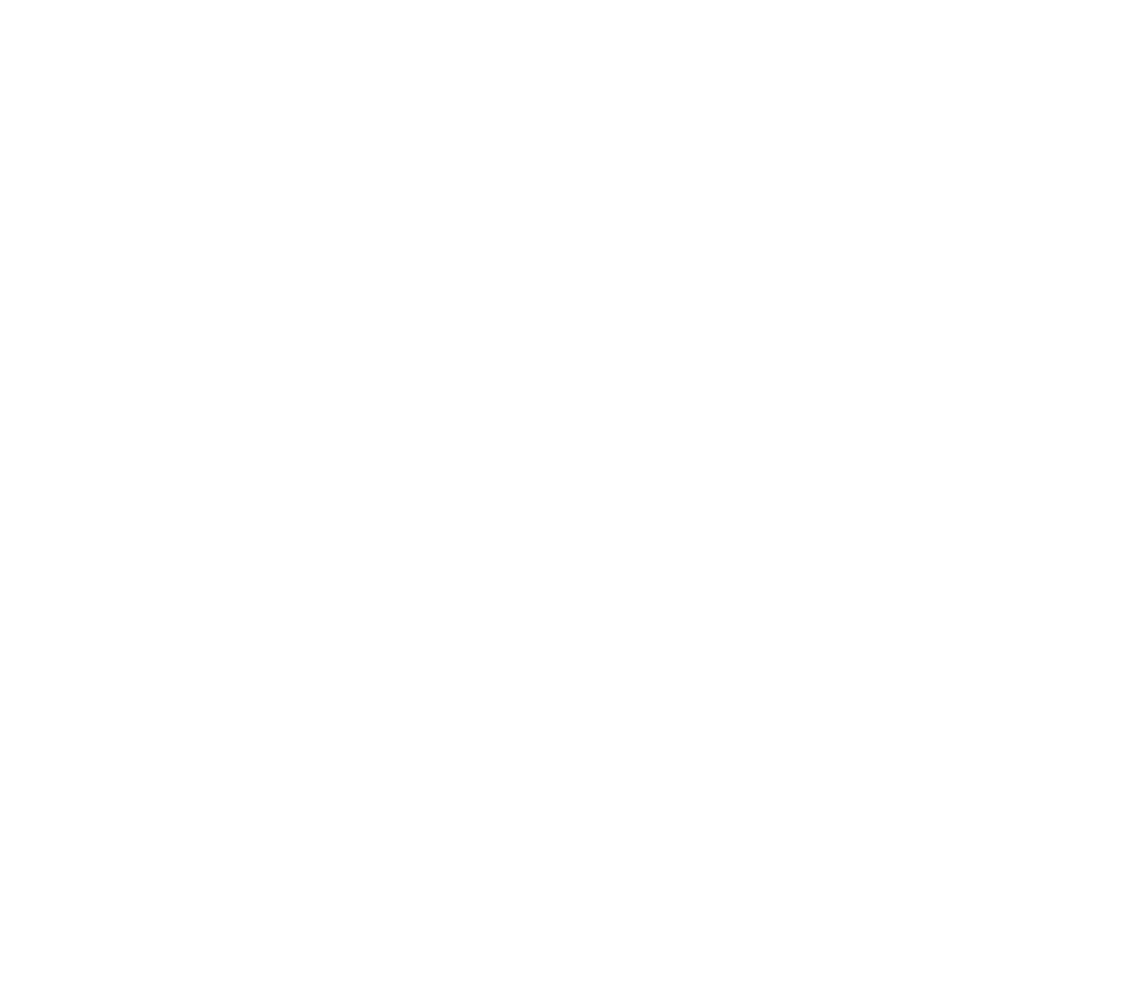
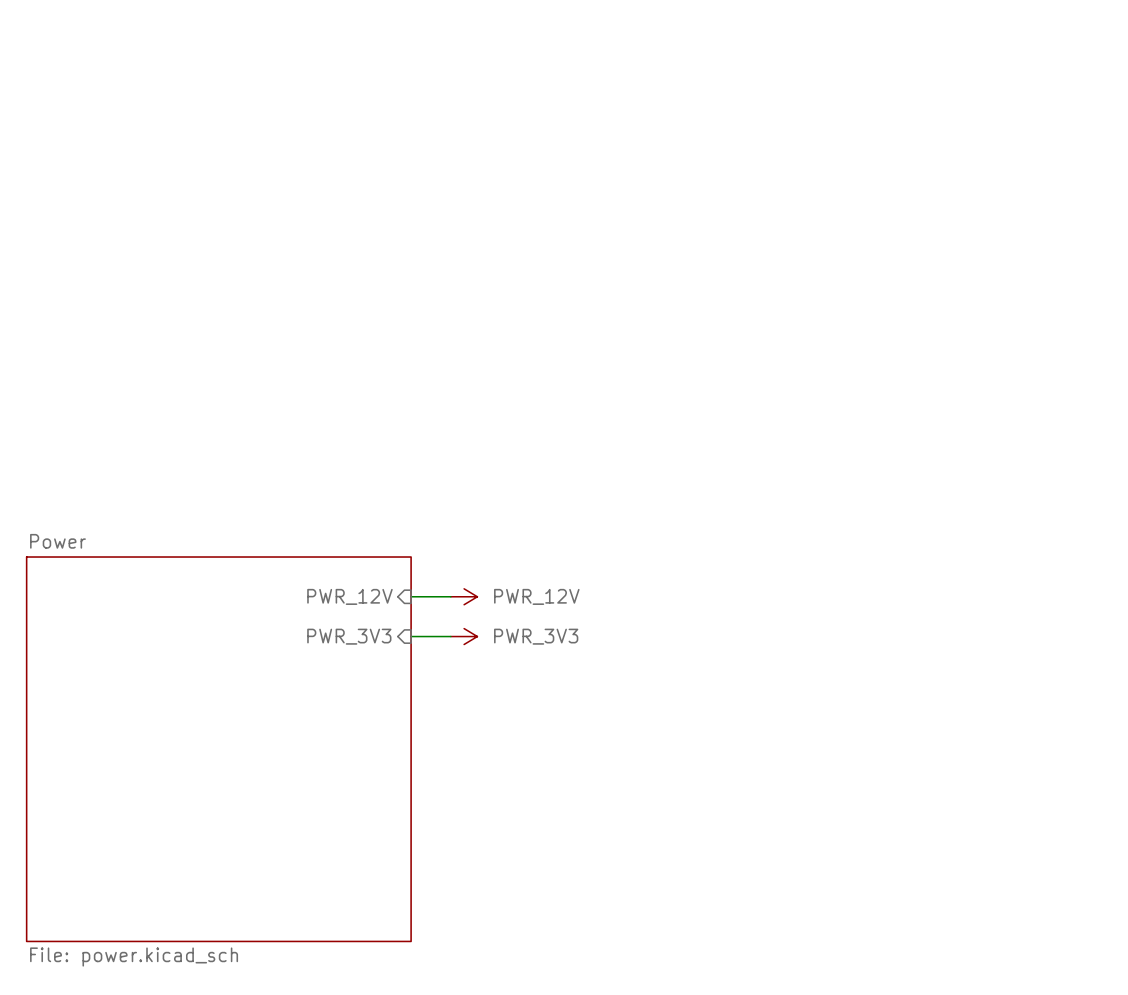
sheet pin: none -> PWR_12V (349, 596)
wire: none -> (411, 596) (450, 596)
power symbol: none -> PWR_12V (464, 596)
sheet pin: none -> PWR_3V3 (349, 636)
wire: none -> (411, 636) (450, 636)
power symbol: none -> PWR_3V3 (464, 636)
sheet Power: none -> File: power.kicad_sch (218, 749)

